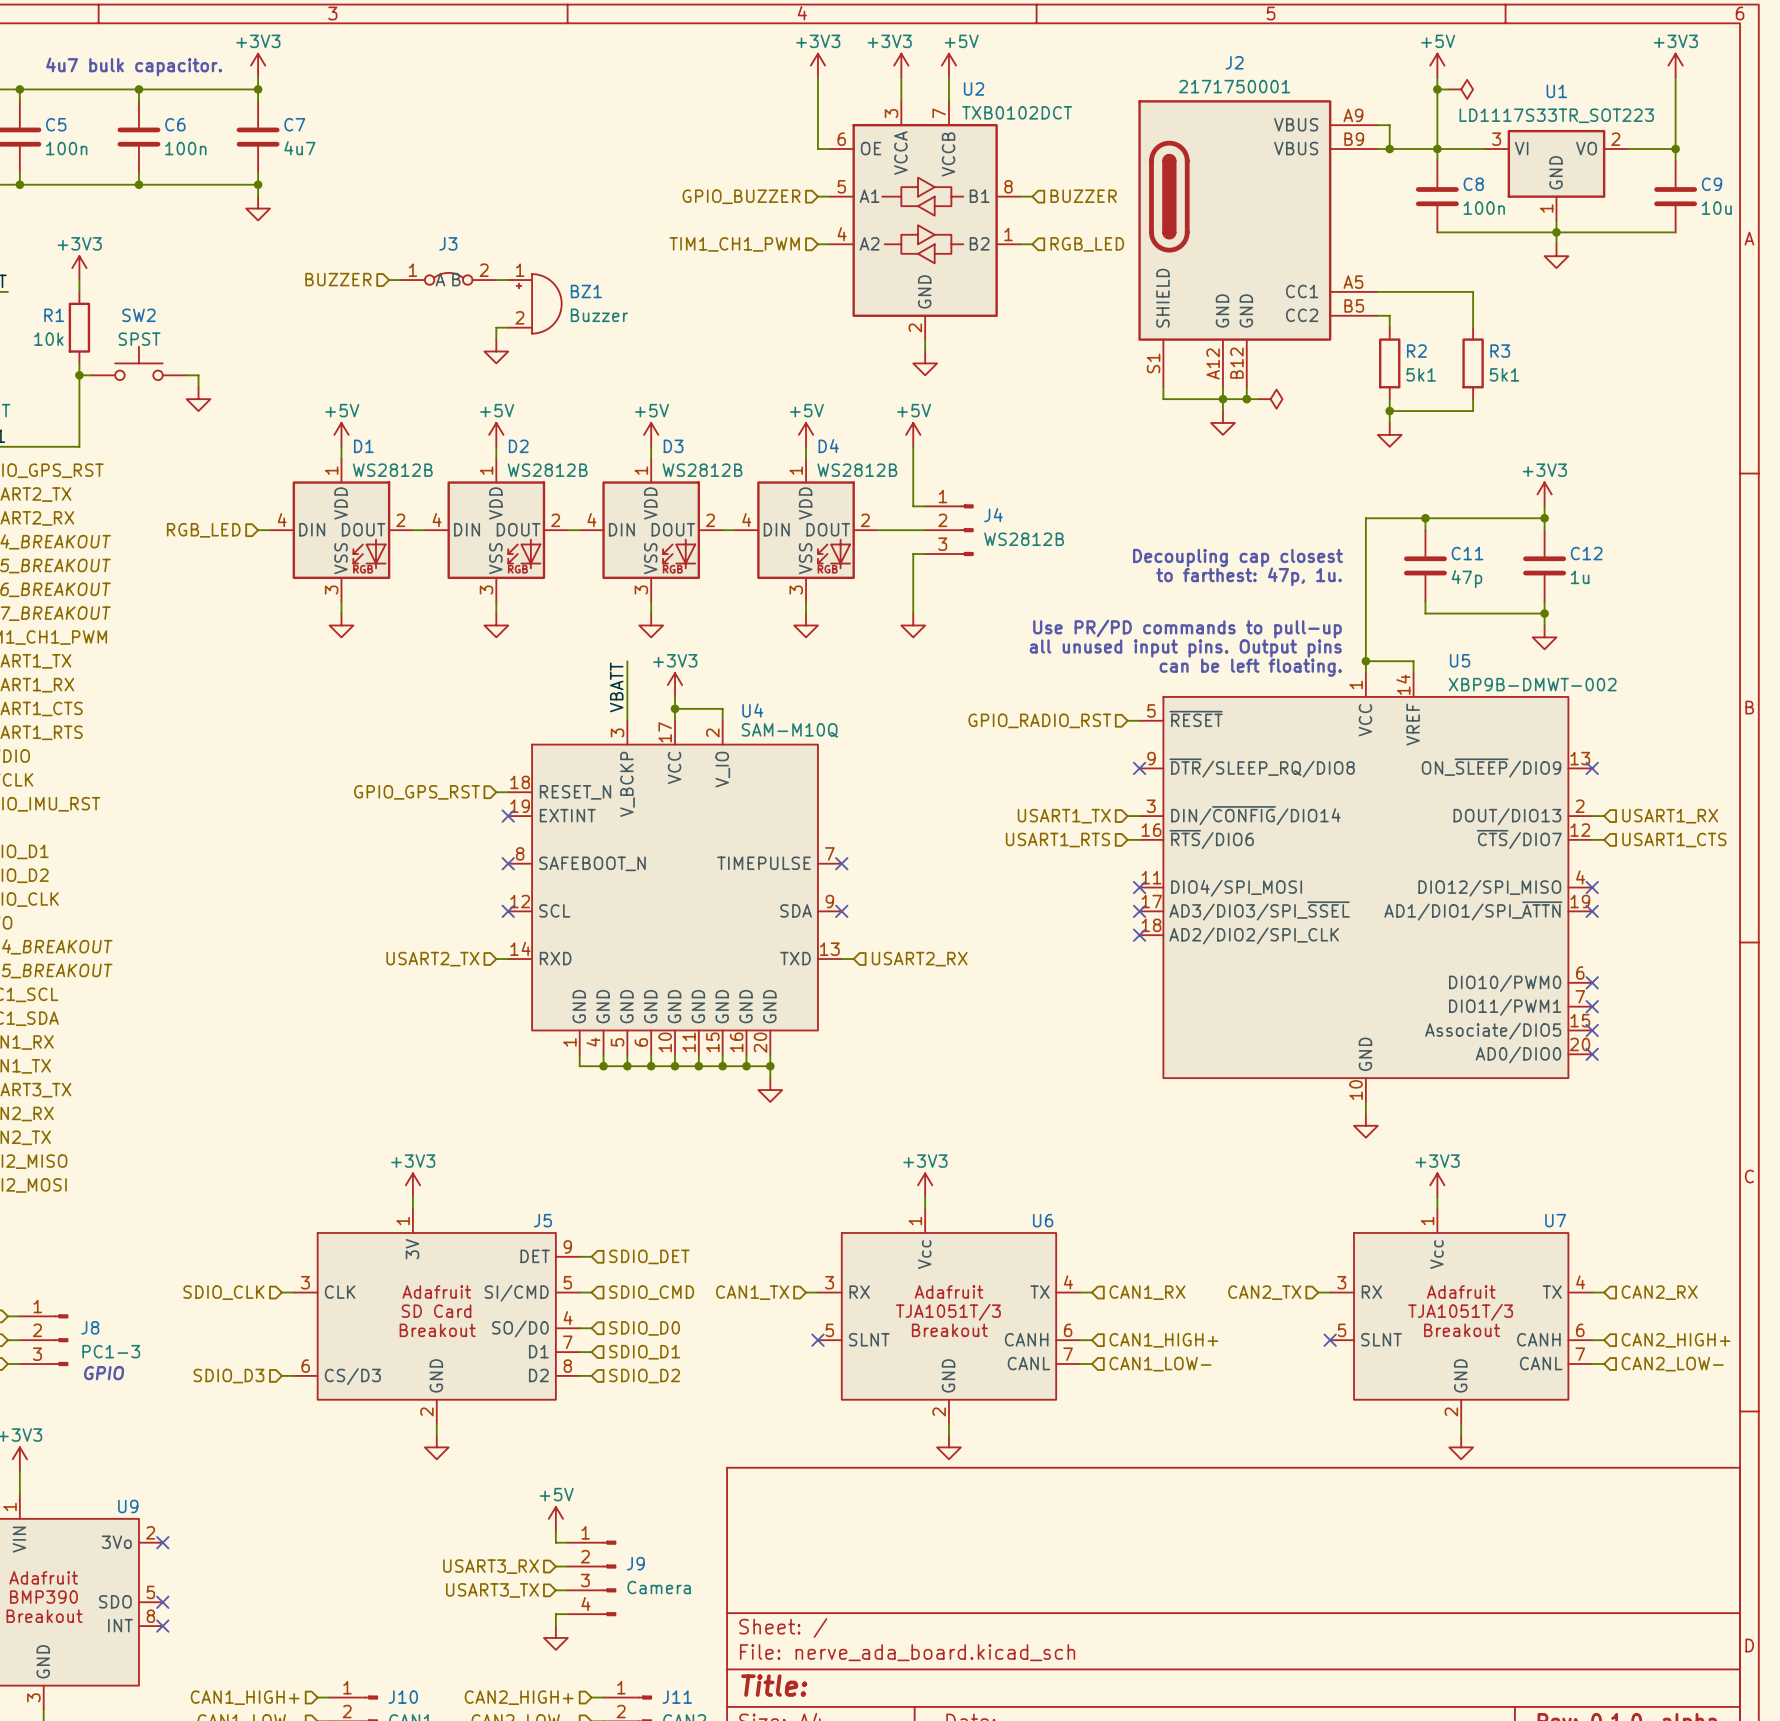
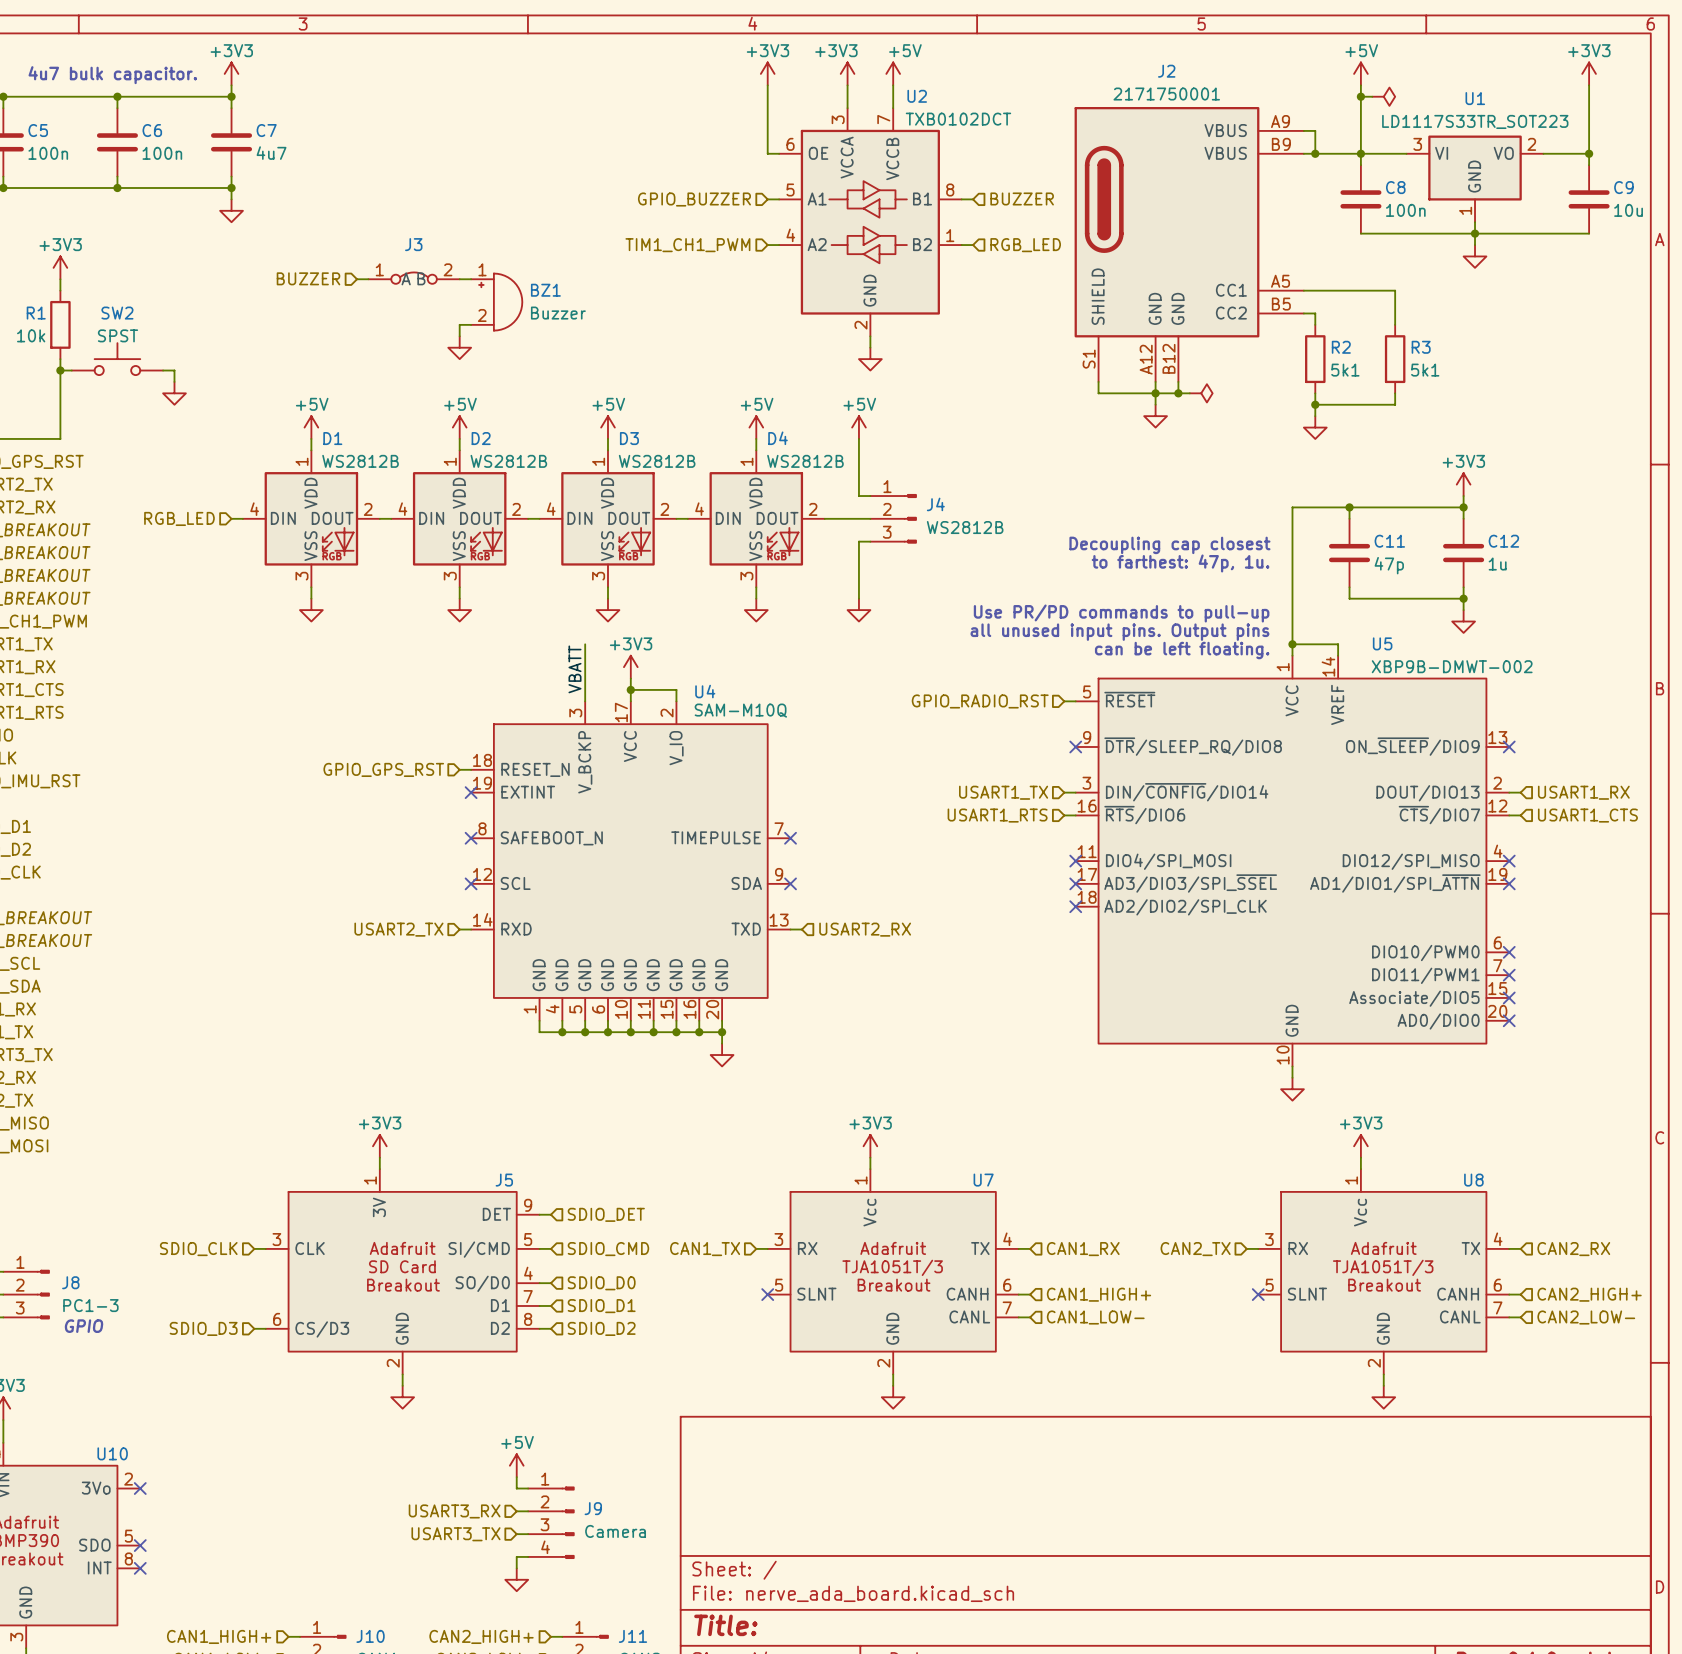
U6 name: U6 (1043, 1220) -> U7 (983, 1180)
U7 name: U7 (1555, 1220) -> U8 (1473, 1180)
U9 name: U9 (128, 1506) -> U10 (112, 1453)

